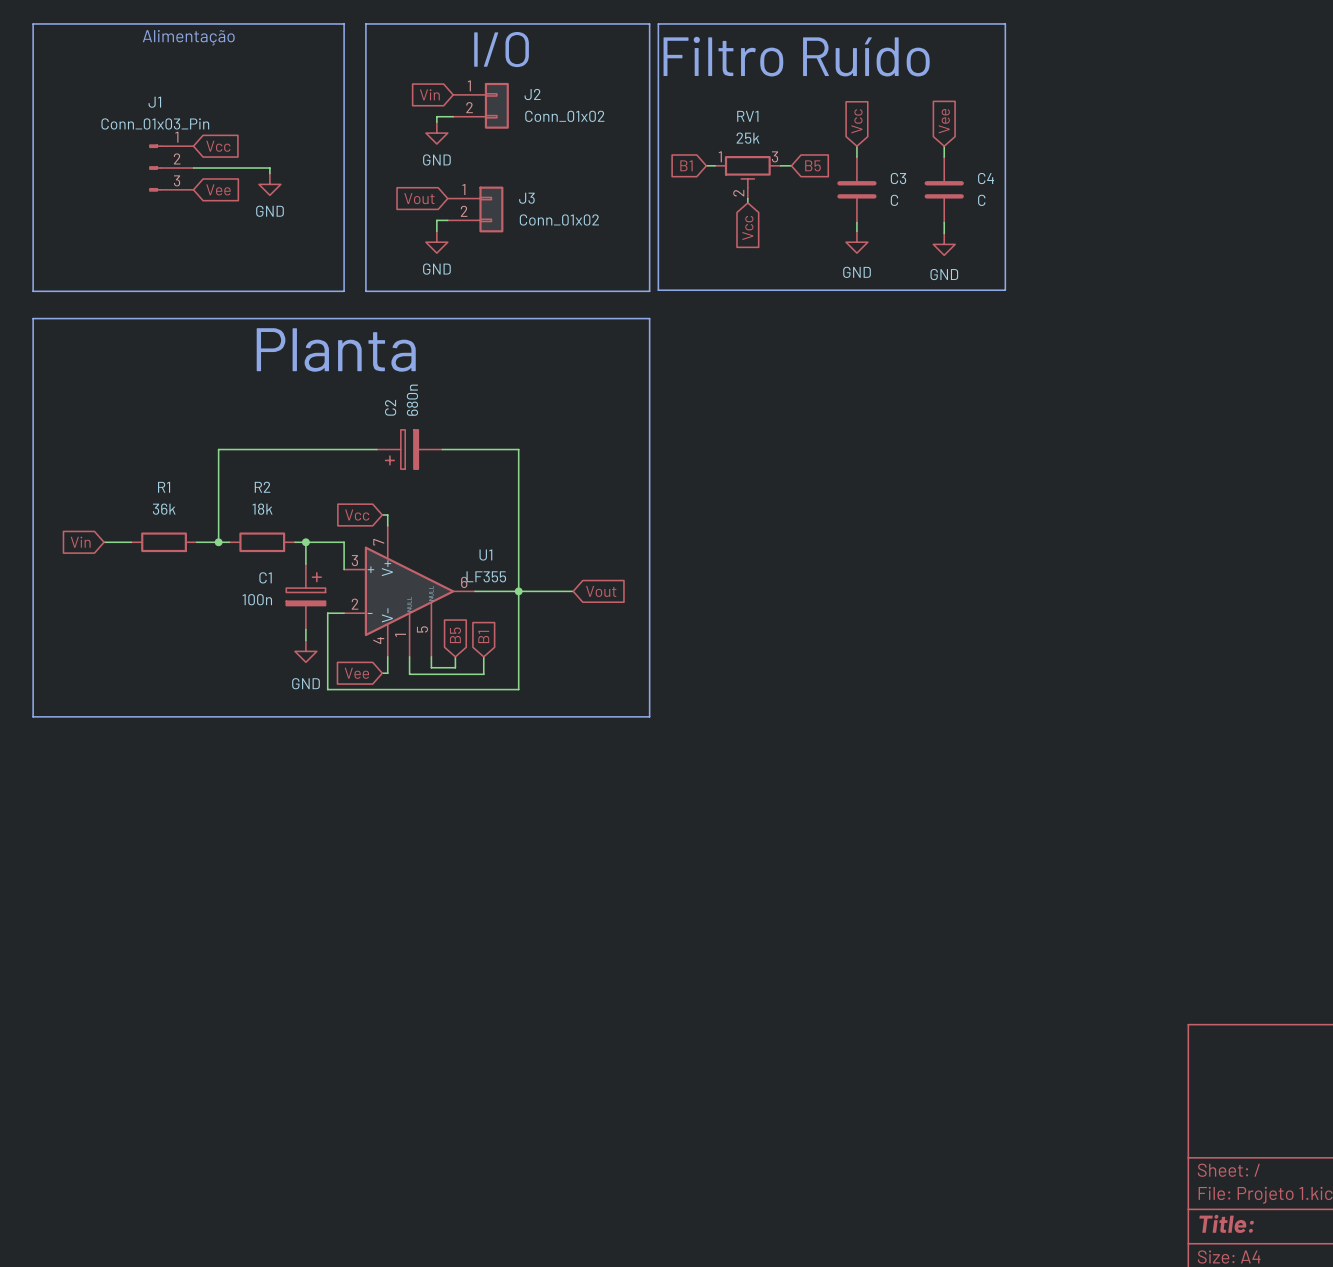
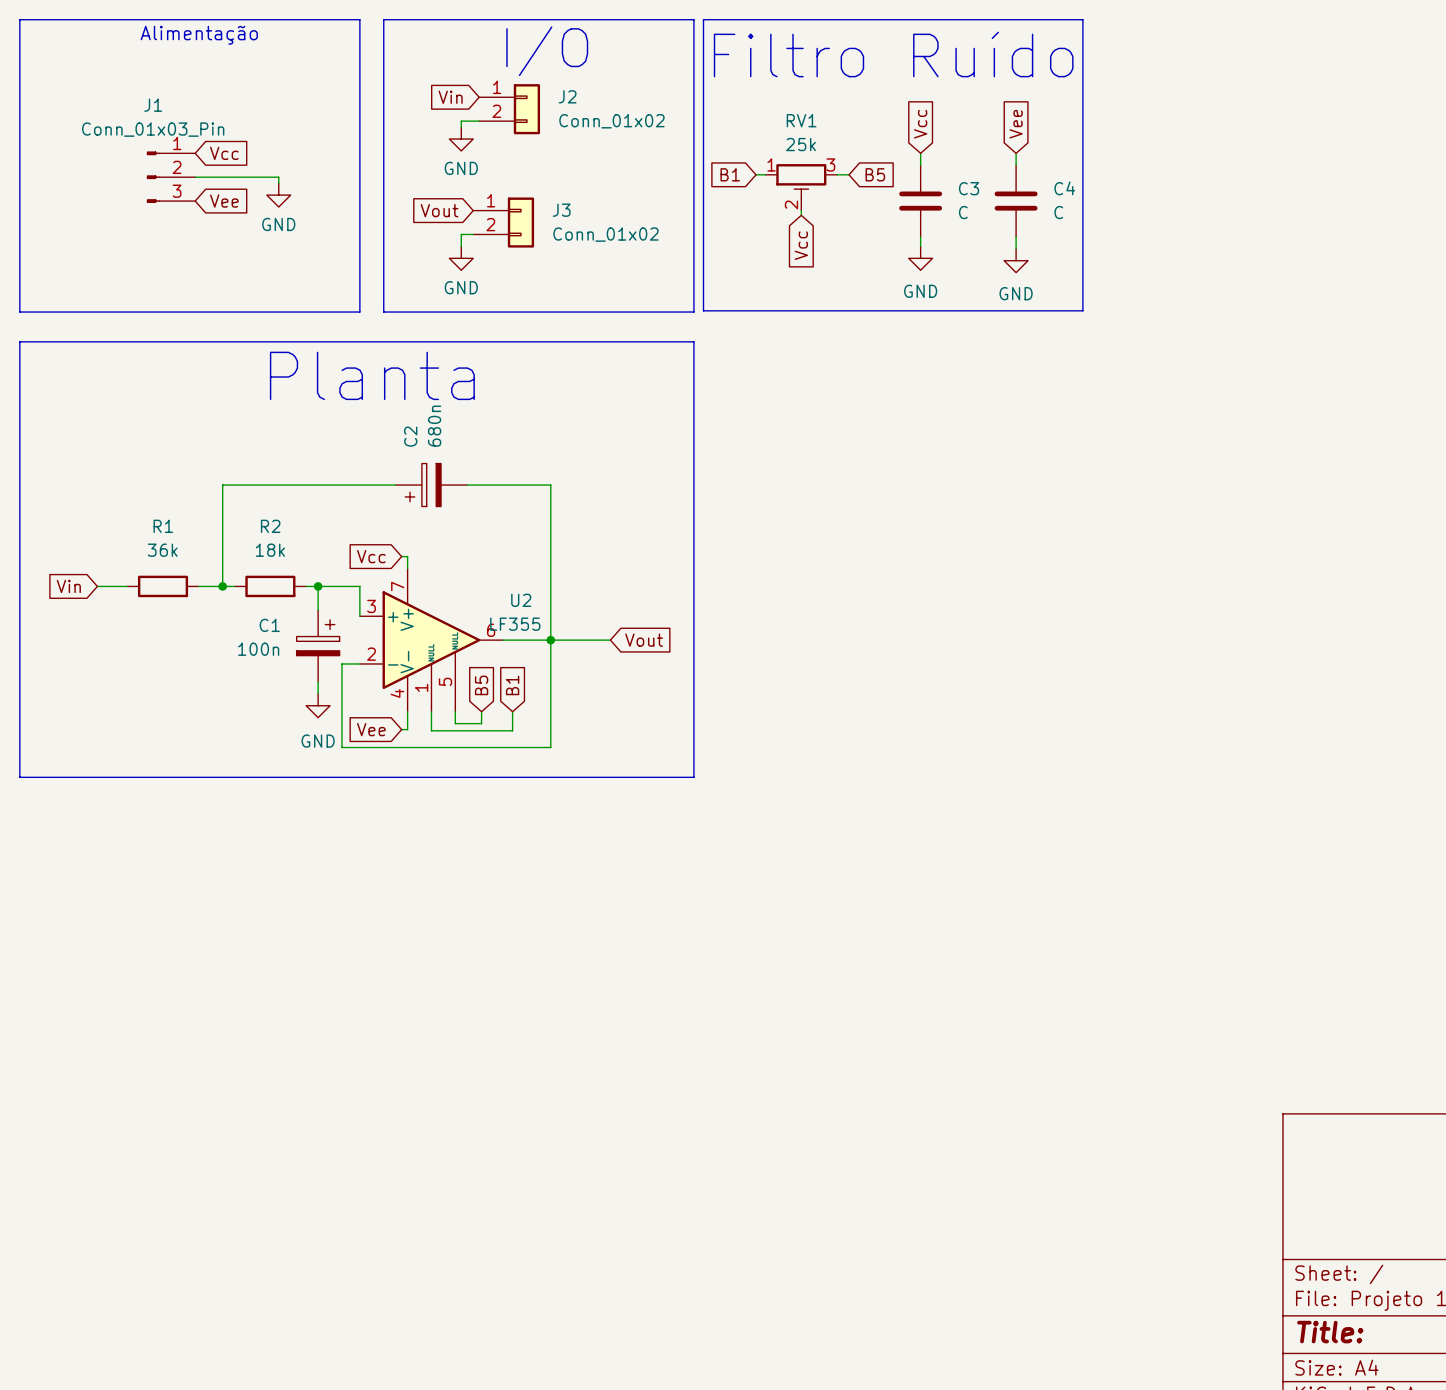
U1 name: U1 (485, 555) -> U2 (521, 600)

